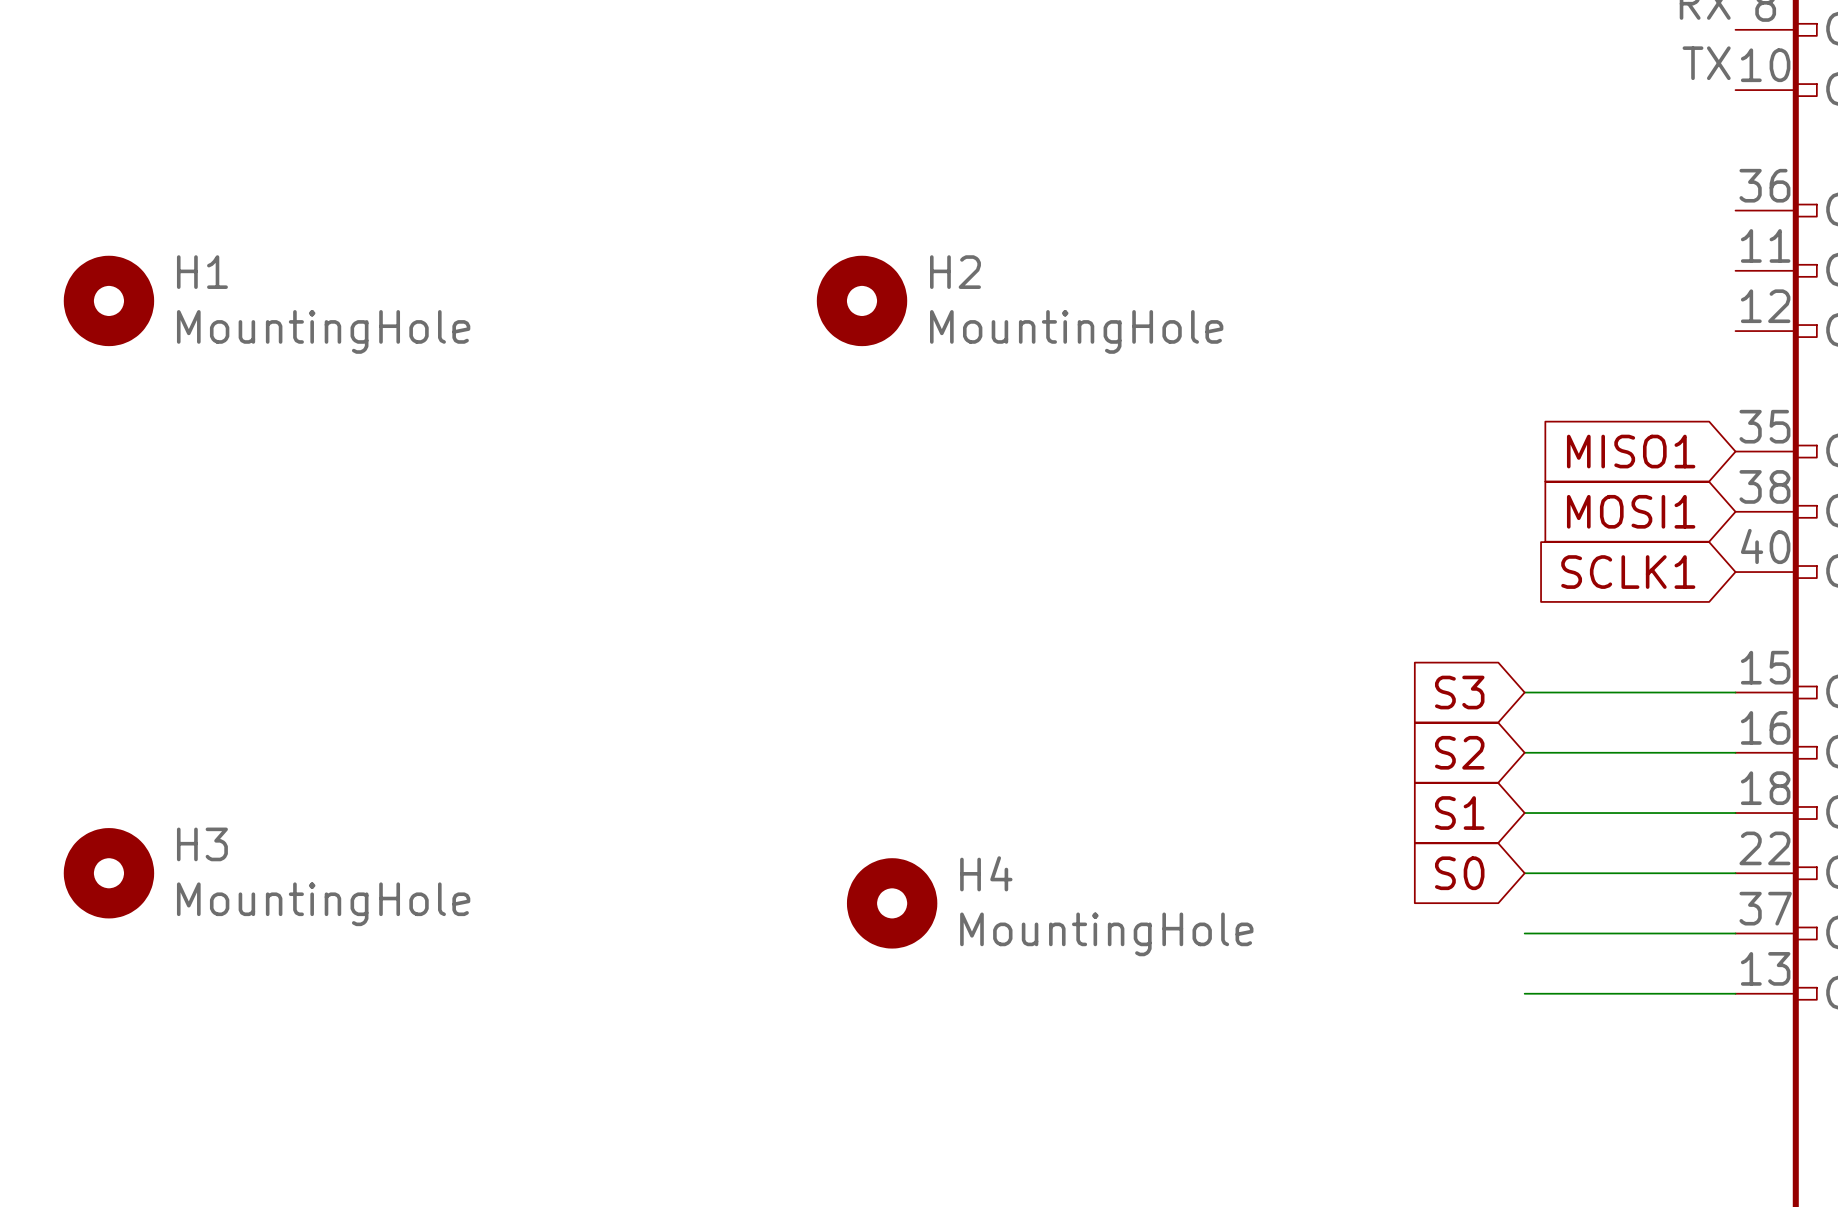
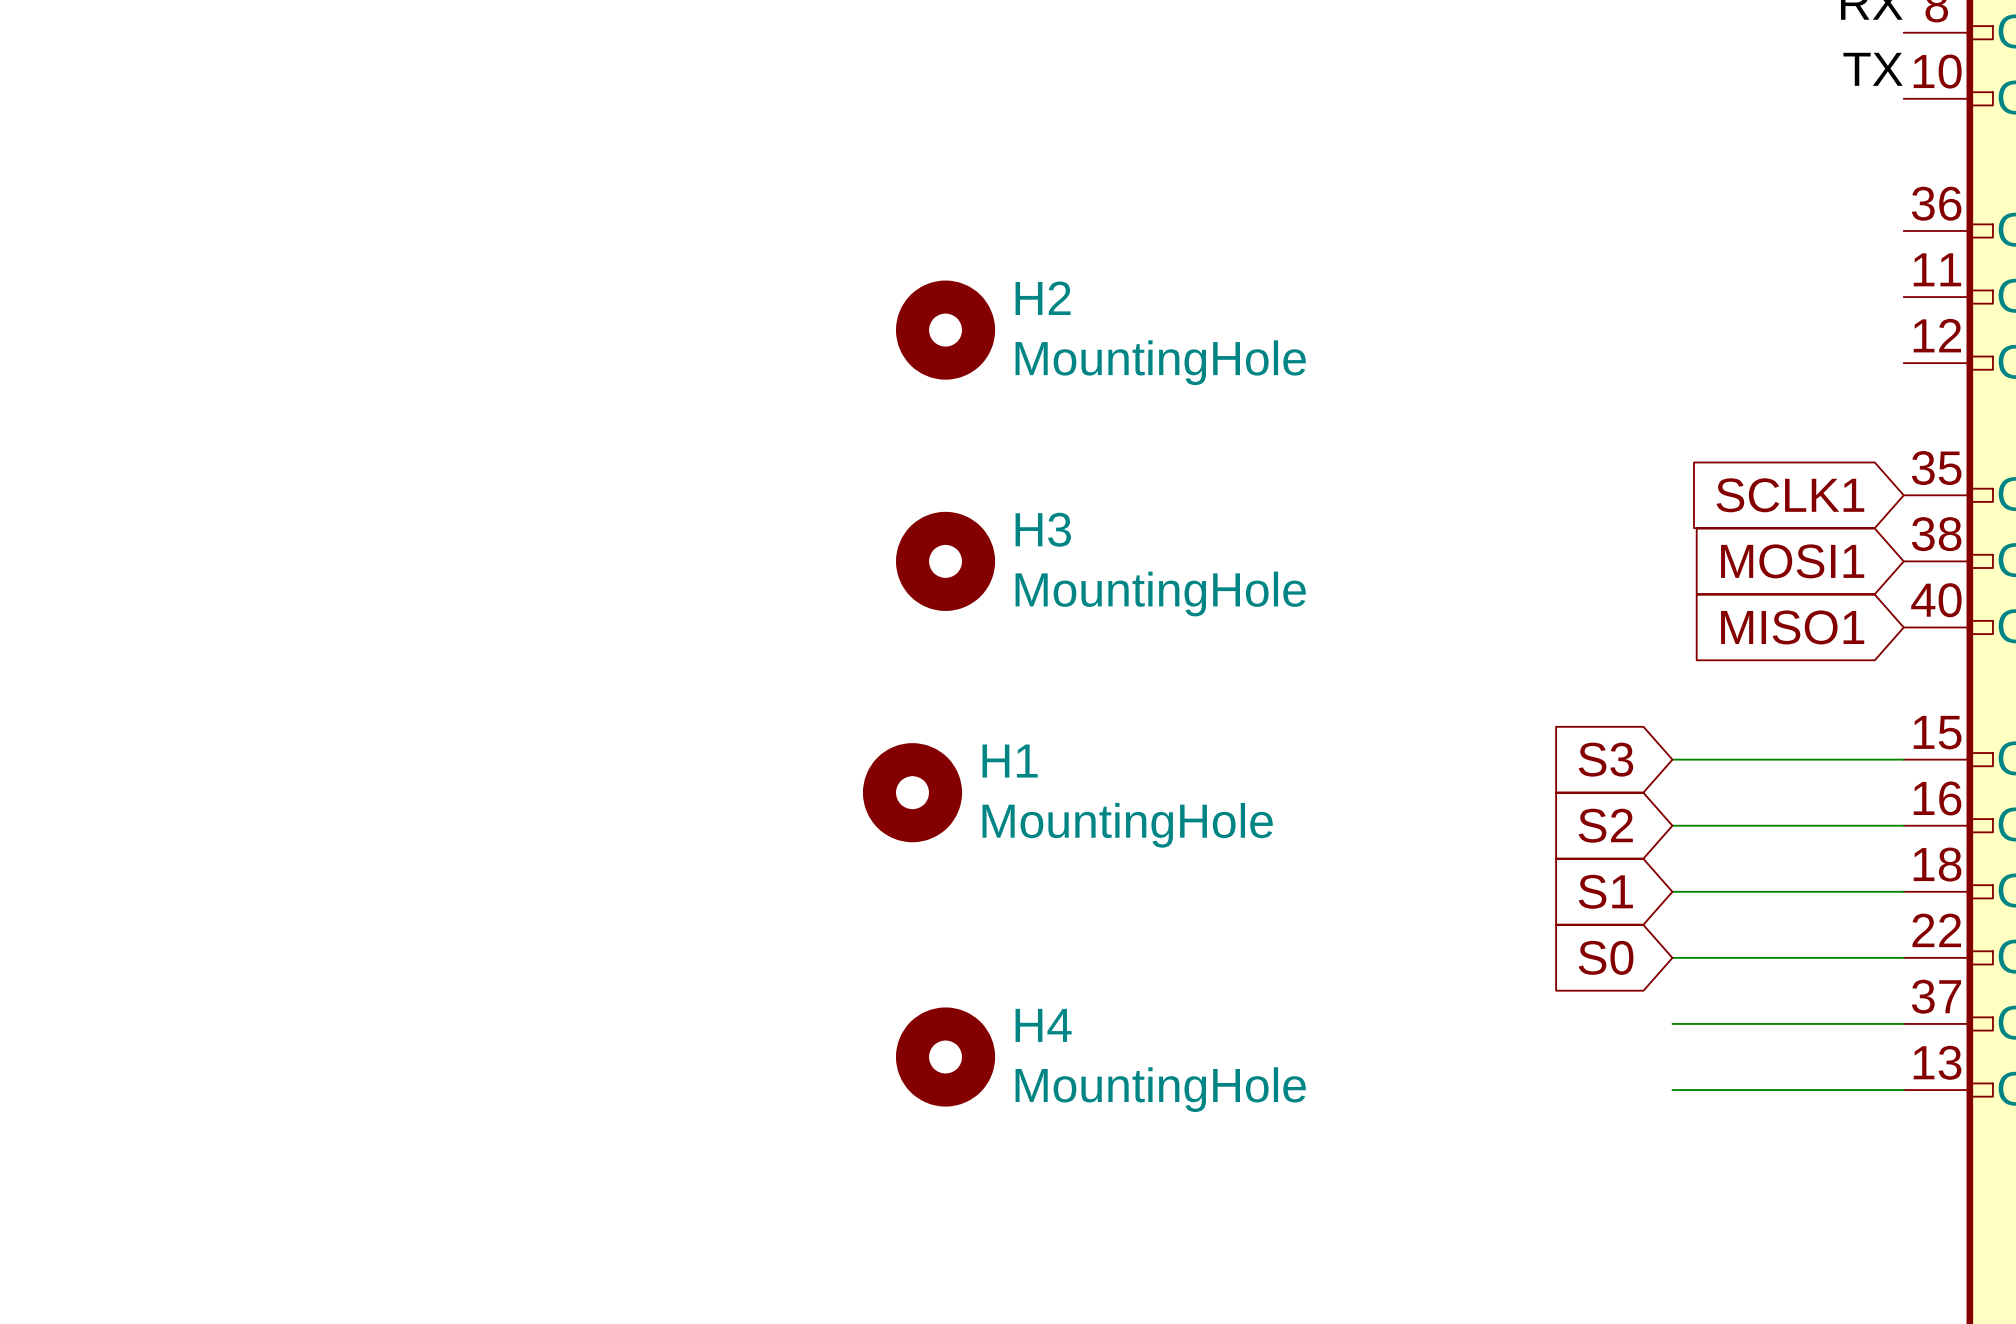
H1 position: (108, 300) -> (912, 792)
global label: MISO1 (1631, 451) -> SCLK1 (1790, 495)
global label: SCLK1 (1628, 572) -> MISO1 (1792, 627)
H3 position: (108, 873) -> (945, 561)
H4 position: (892, 903) -> (945, 1057)

